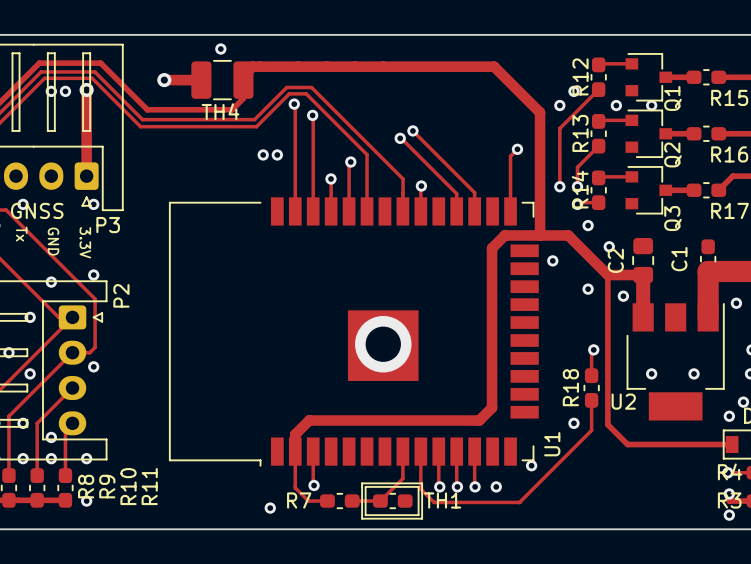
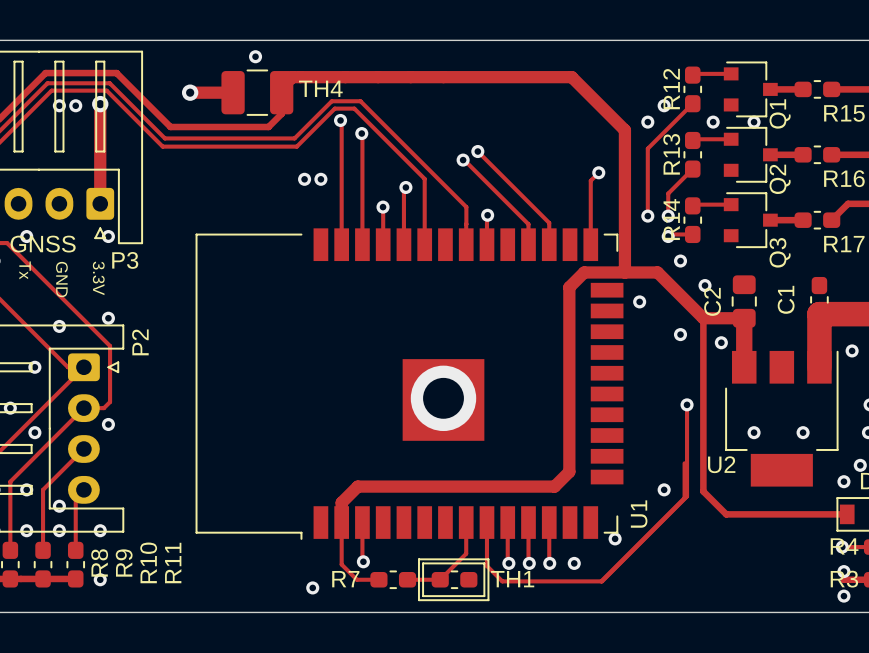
TH4 name position: TH4 (220, 111) -> TH4 (320, 88)
track: (593, 349) (591, 352) (591, 375) -> (687, 404) (687, 496) (602, 581)
R18: (591, 388) -> none

